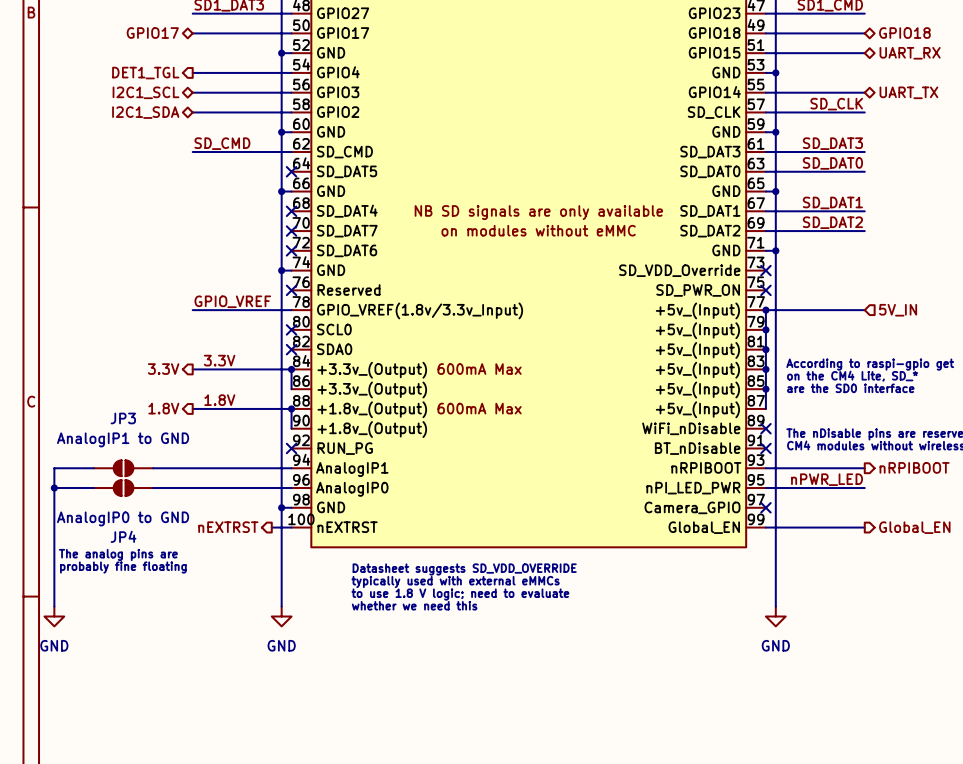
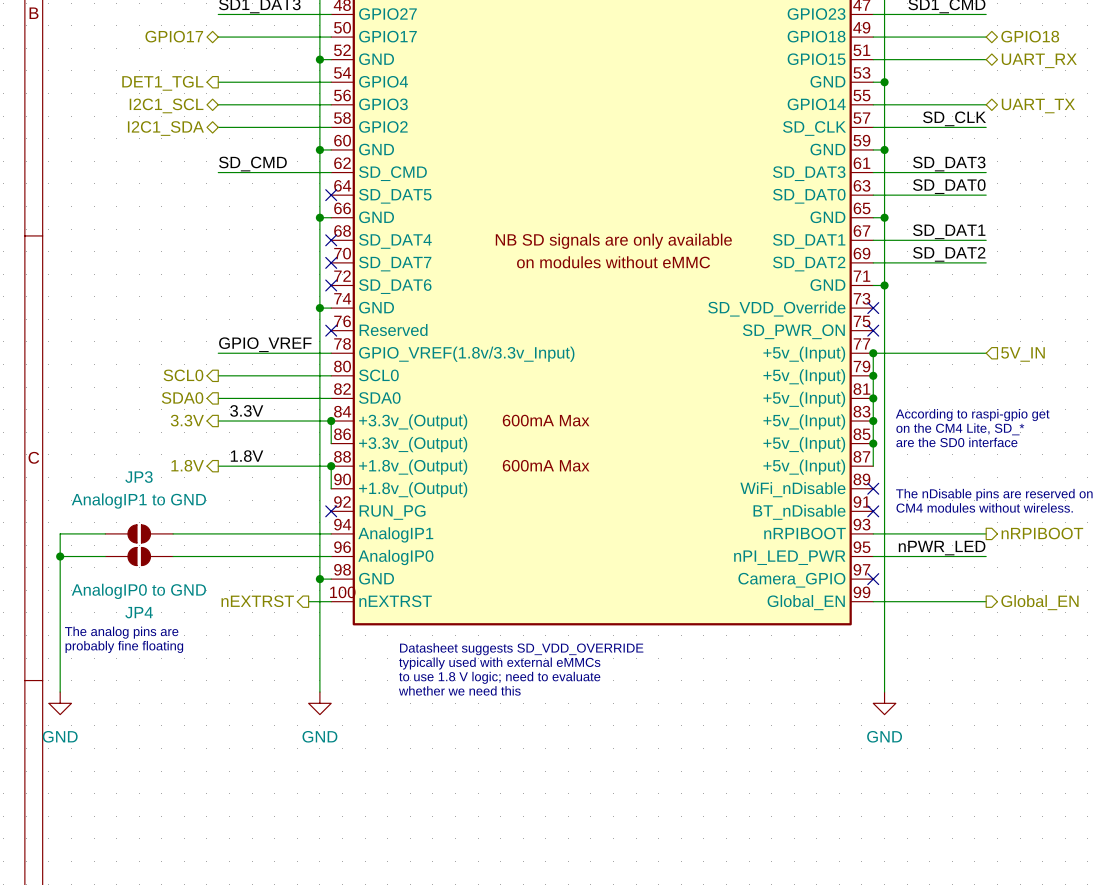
hierarchical label: none -> SCL0 (183, 375)
wire: none -> (218, 375) (331, 375)
no-connect mark: (291, 329) -> none
hierarchical label: none -> SDA0 (182, 397)
wire: none -> (218, 398) (331, 398)
no-connect mark: (291, 349) -> none

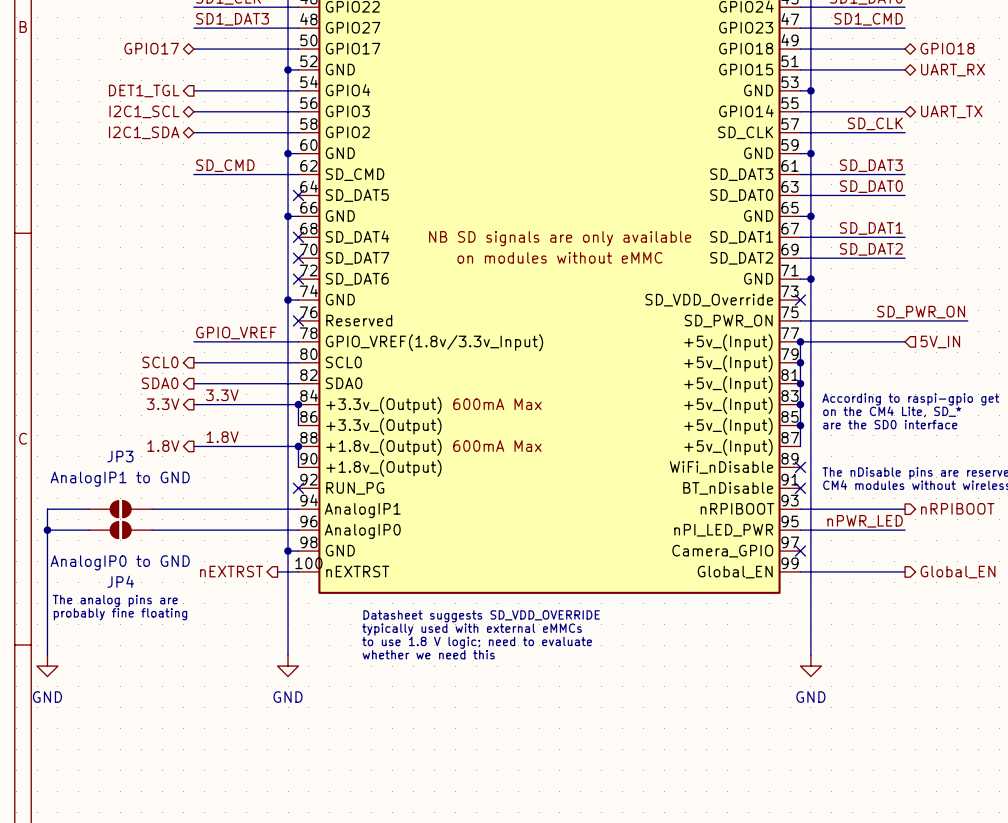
label: none -> SD_PWR_ON (921, 312)
wire: none -> (800, 320) (967, 320)
no-connect mark: (873, 330) -> none

